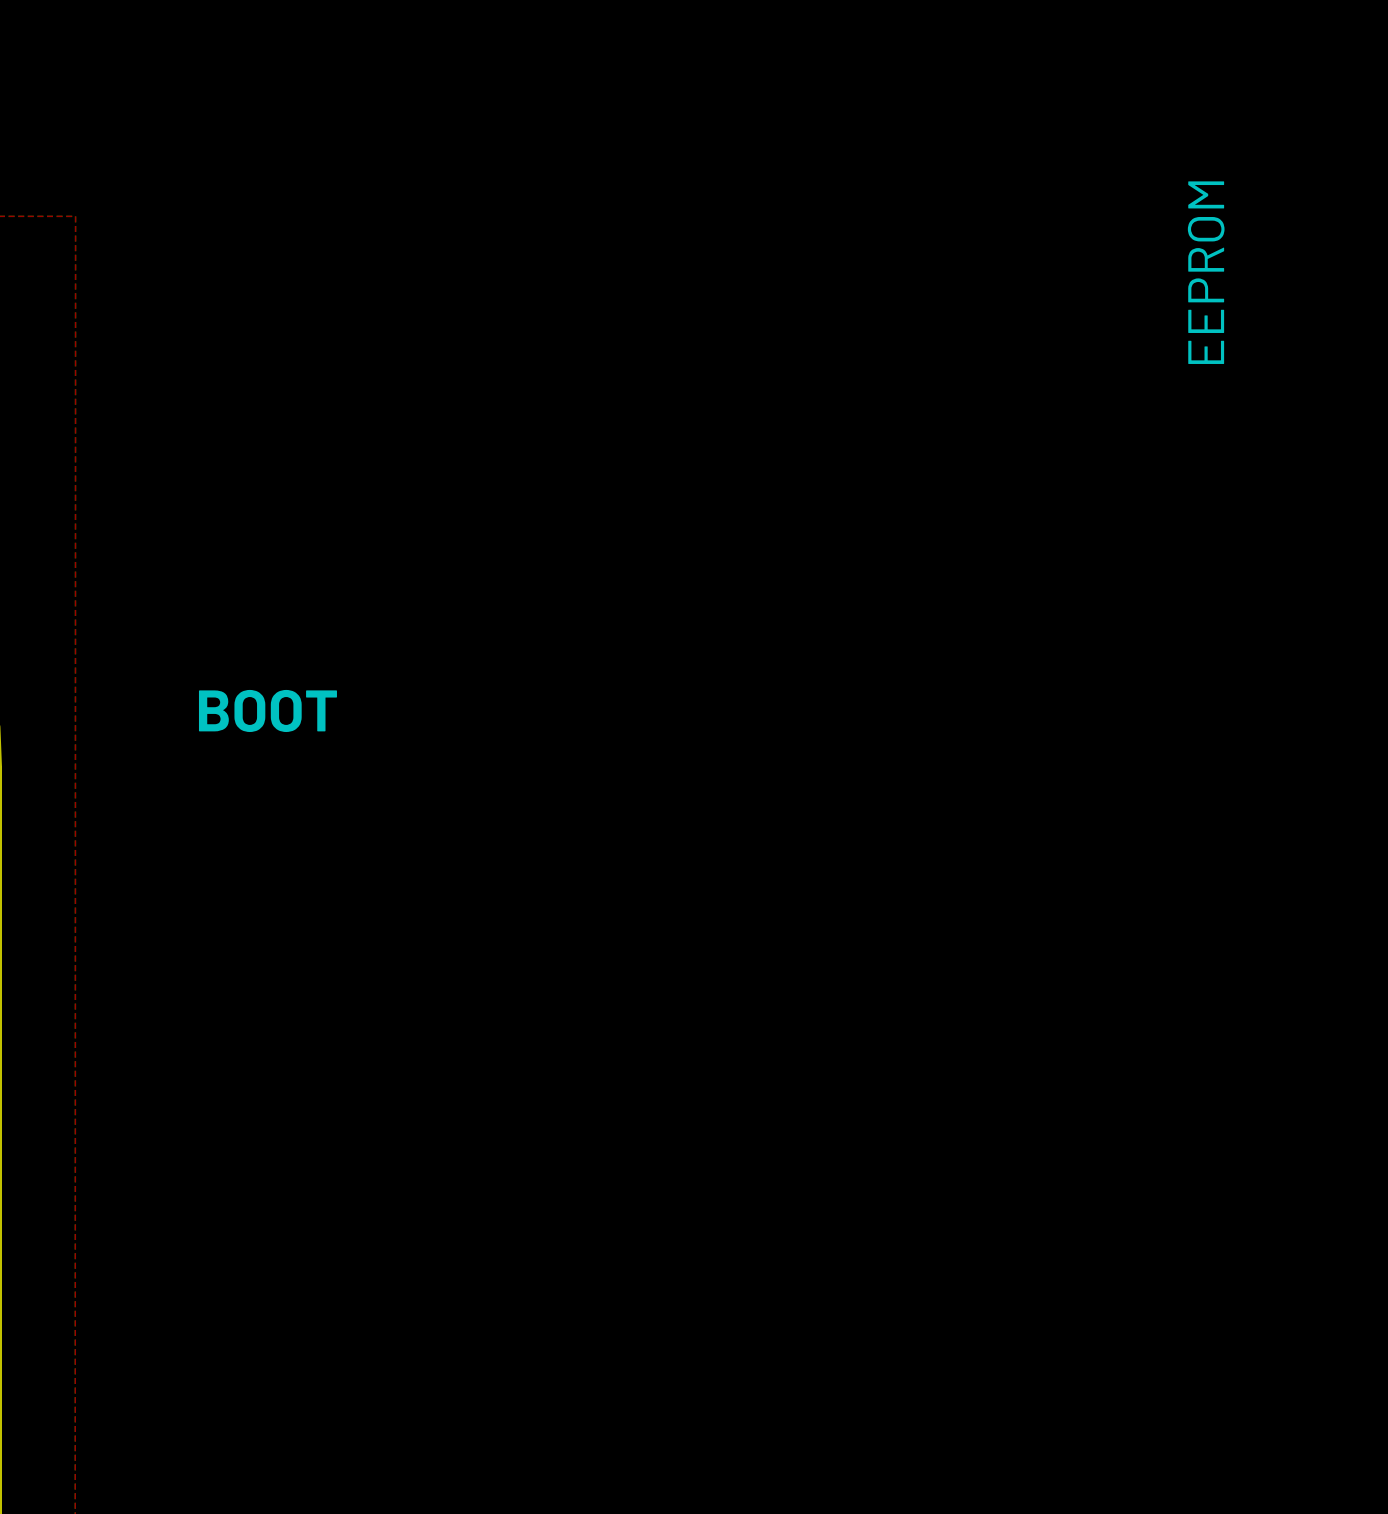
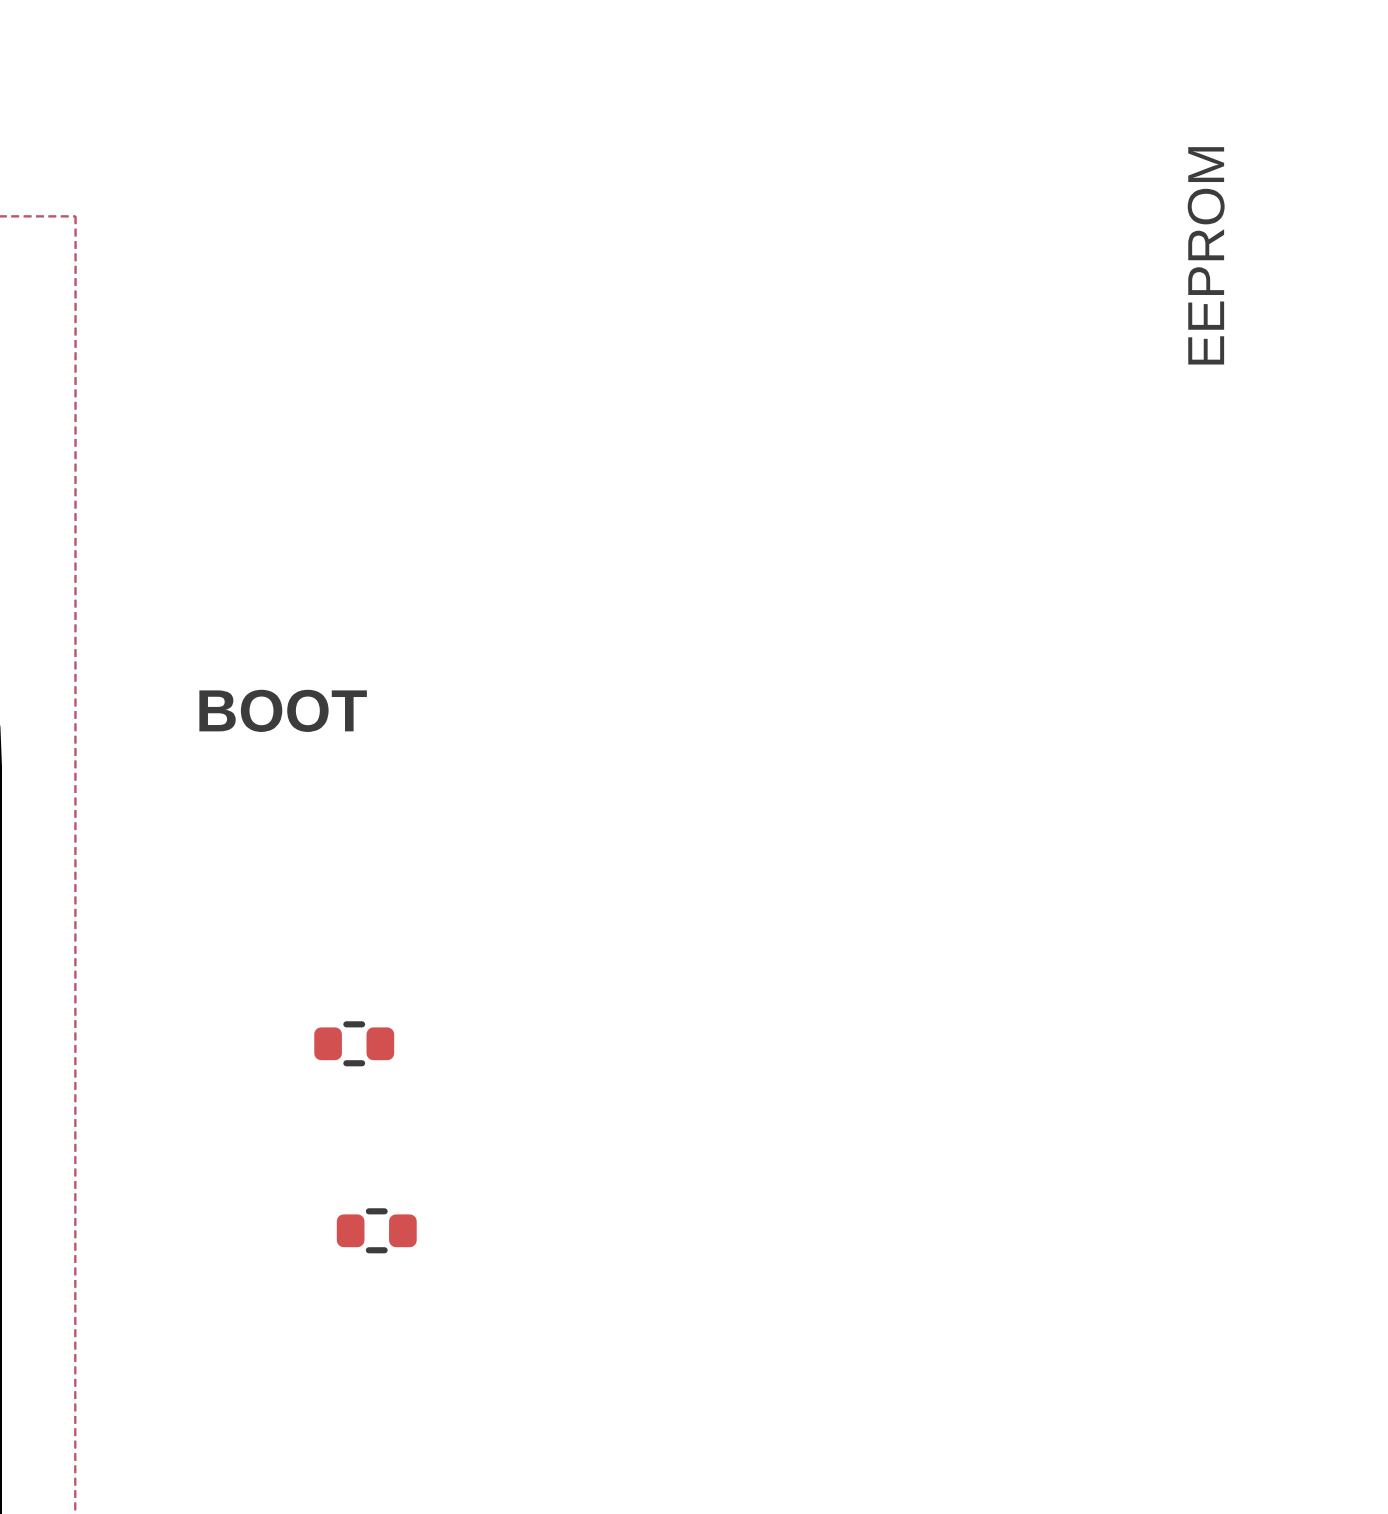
part: none -> (354, 1043)
part: none -> (376, 1230)

